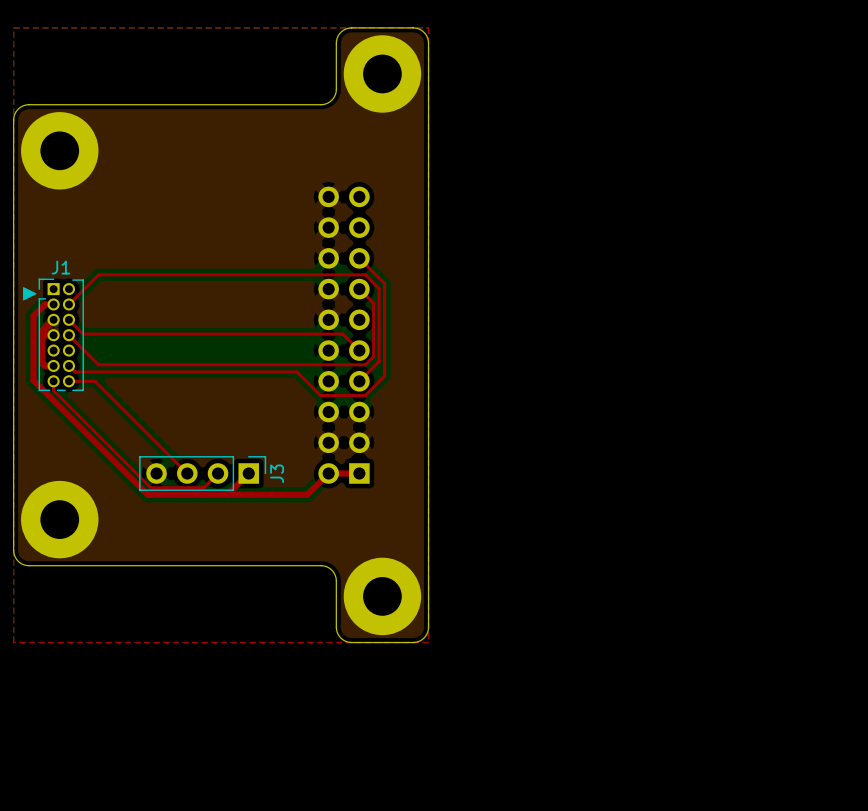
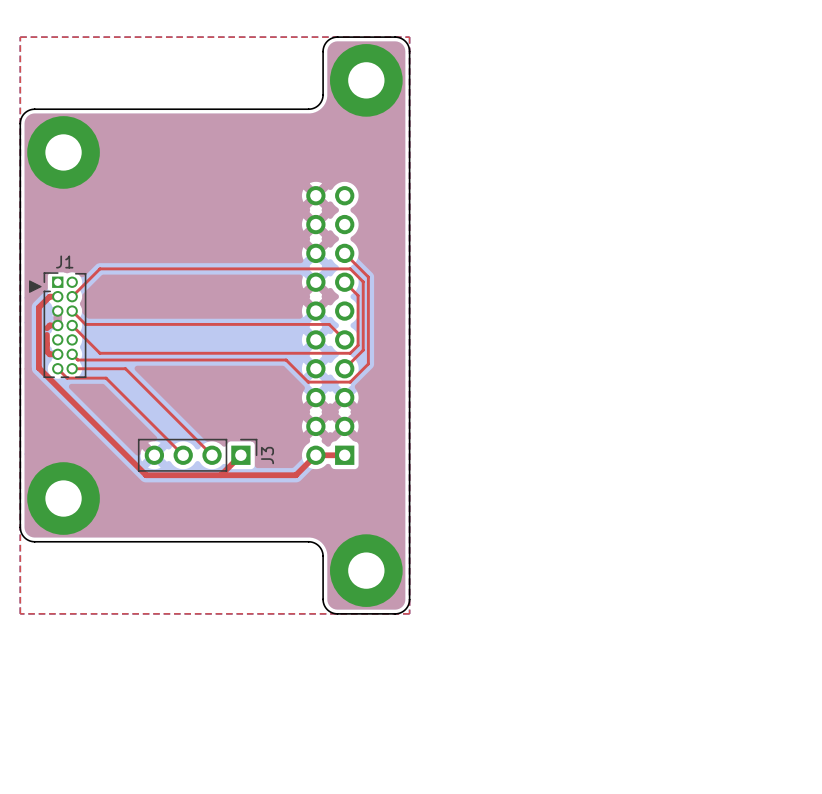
top track: (53, 319) (42, 331) (42, 345) -> none
top track: (53, 381) (53, 390) (150, 487) (203, 487) (218, 473) -> (96, 368) (125, 368) (212, 455)
top track: (95, 381) (105, 391) -> (57, 368) (67, 378) (106, 378)

